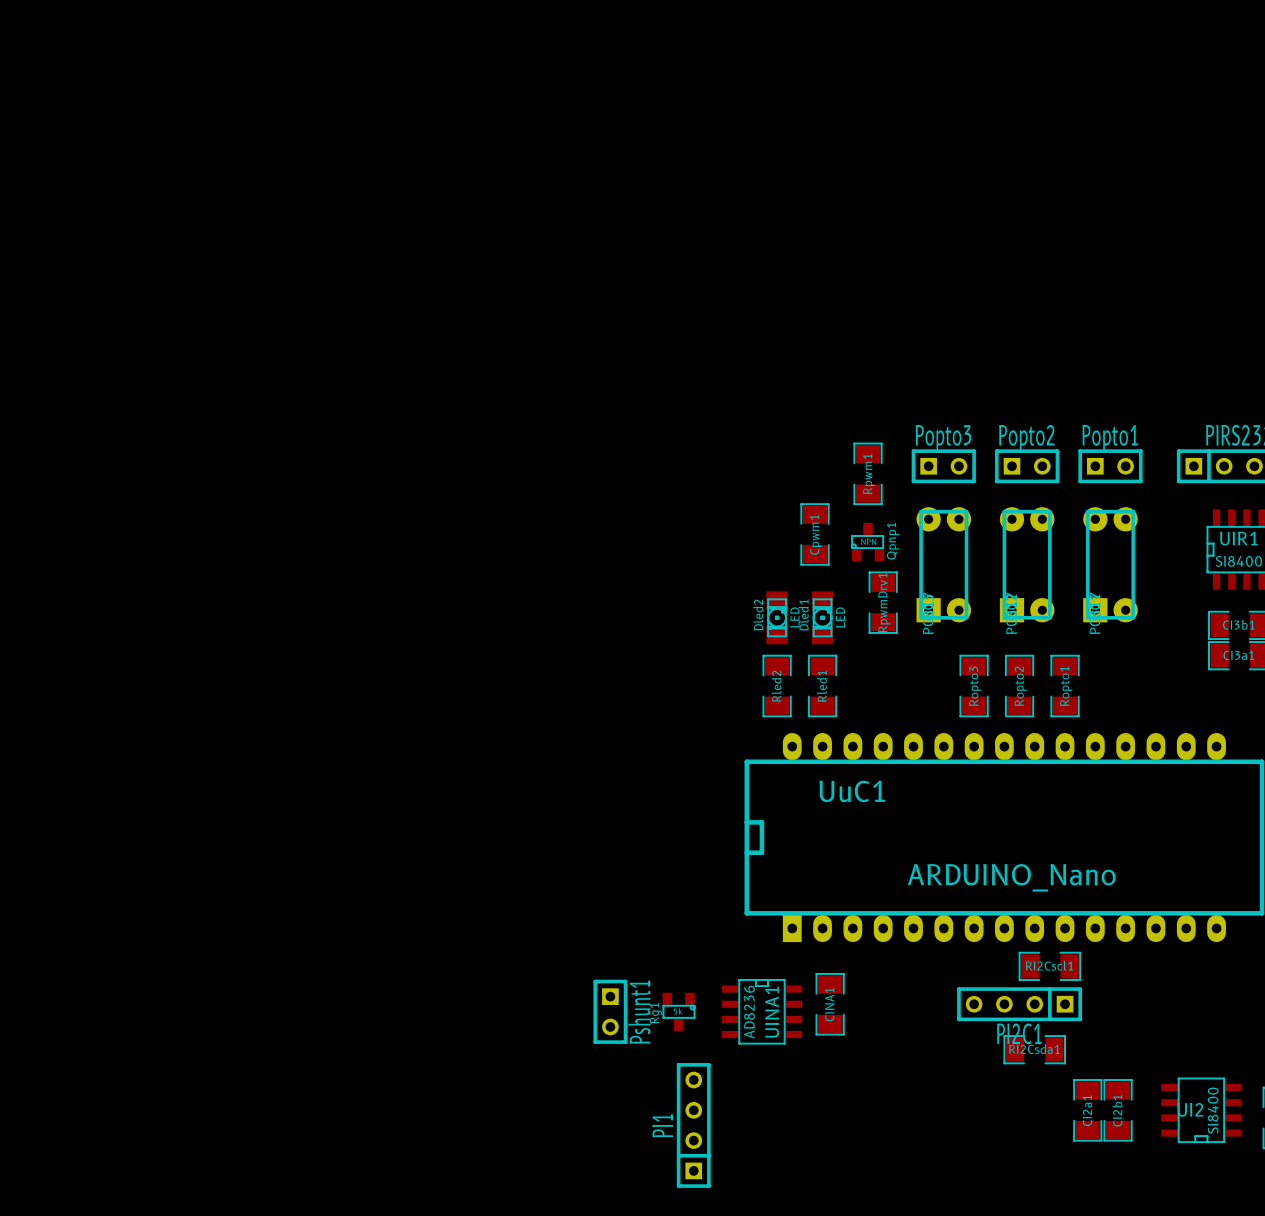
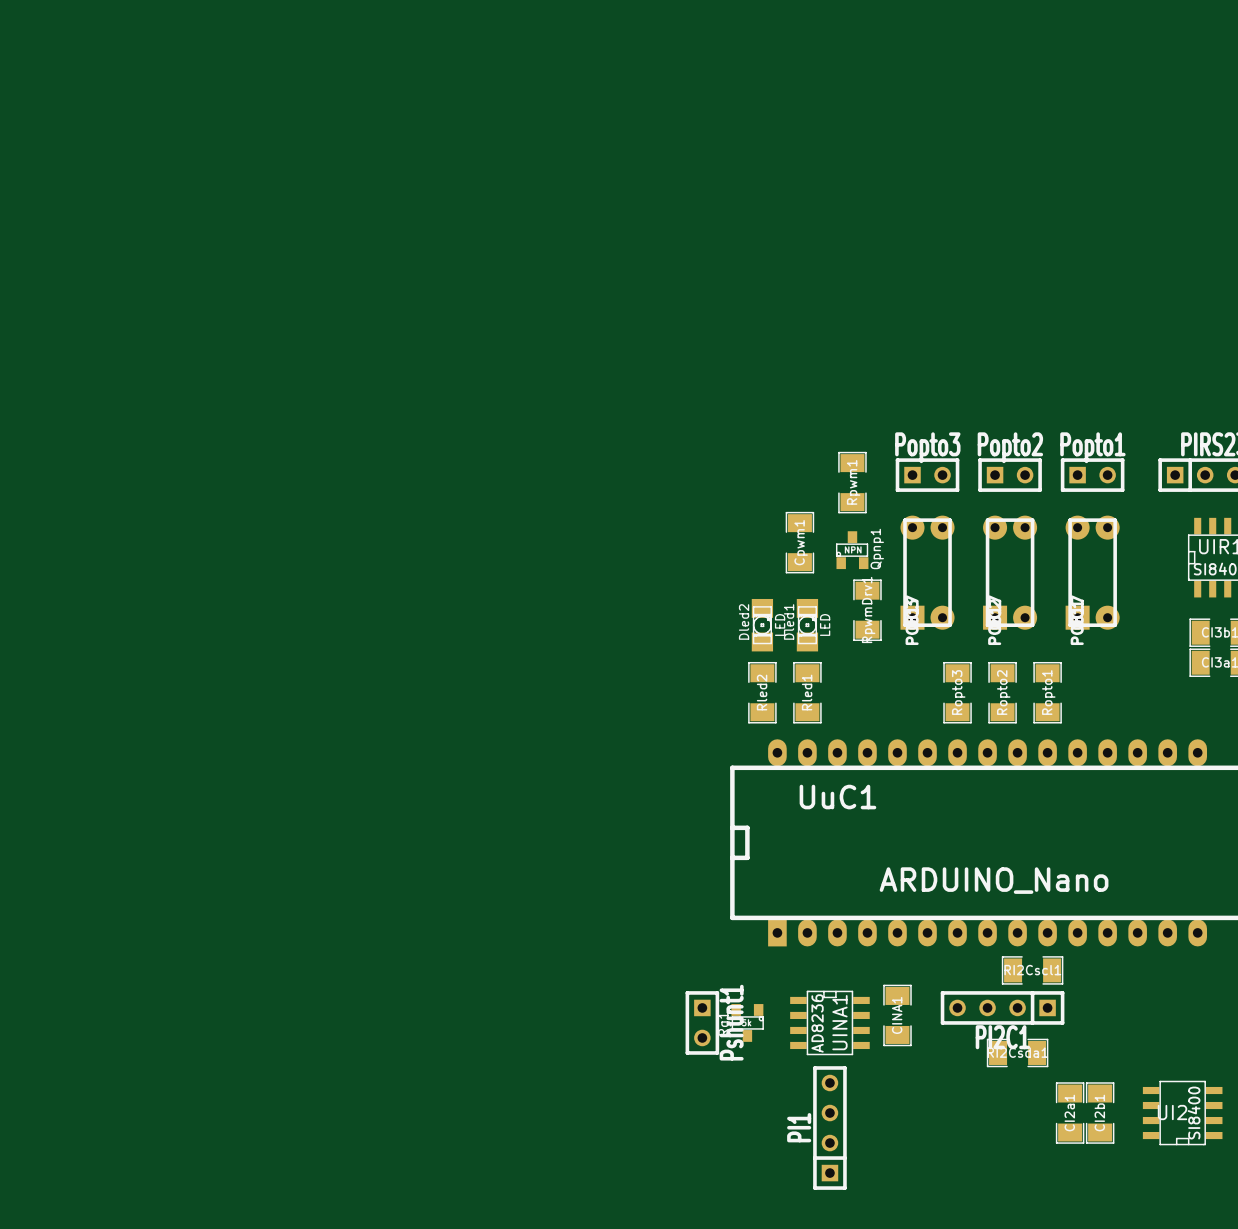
CINA1 position: (830, 1004) -> (897, 1015)
Pshunt1 position: (610, 1011) -> (702, 1022)
Rg1 position: (678, 1011) -> (747, 1022)
UINA1 position: (761, 1011) -> (829, 1022)
PI1 position: (693, 1125) -> (829, 1128)

